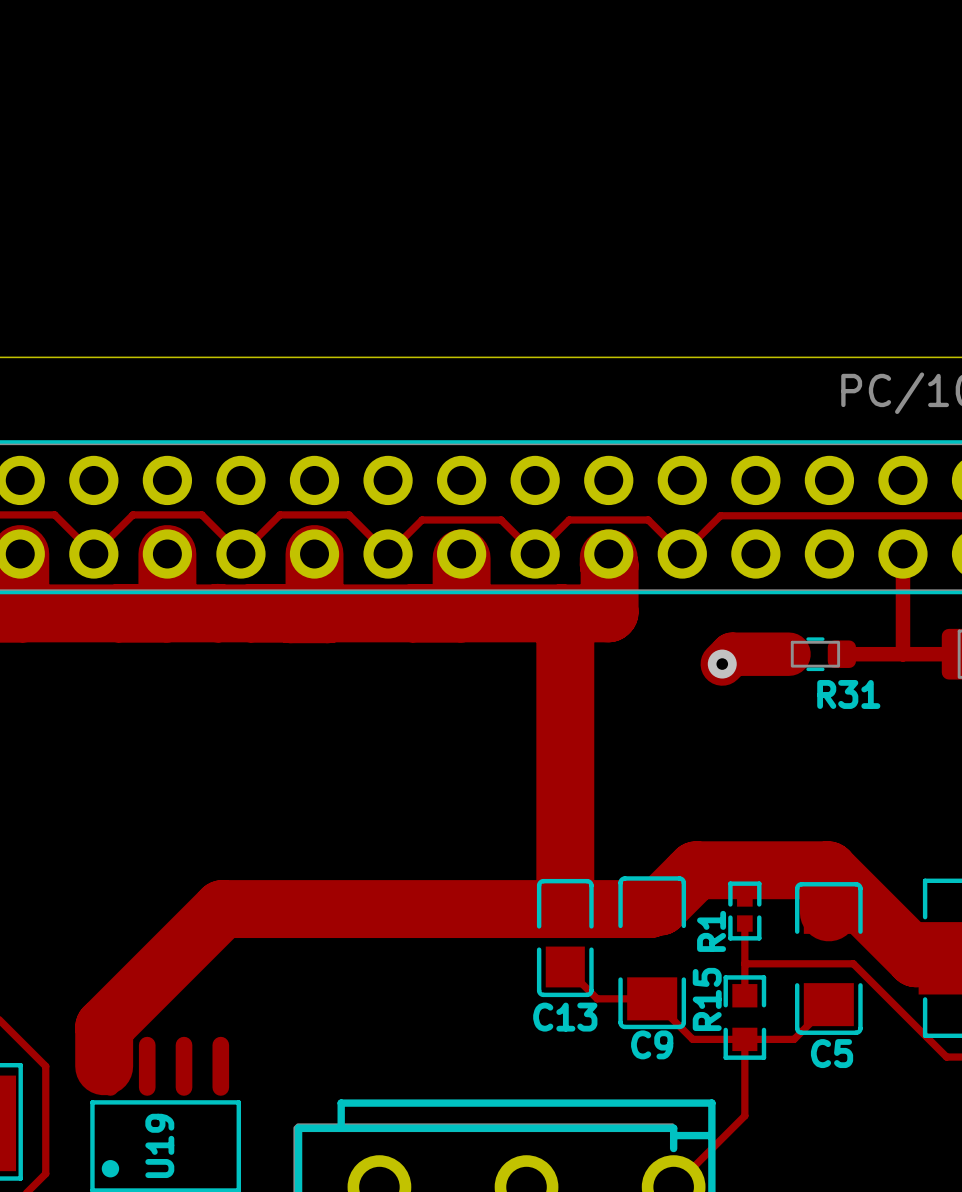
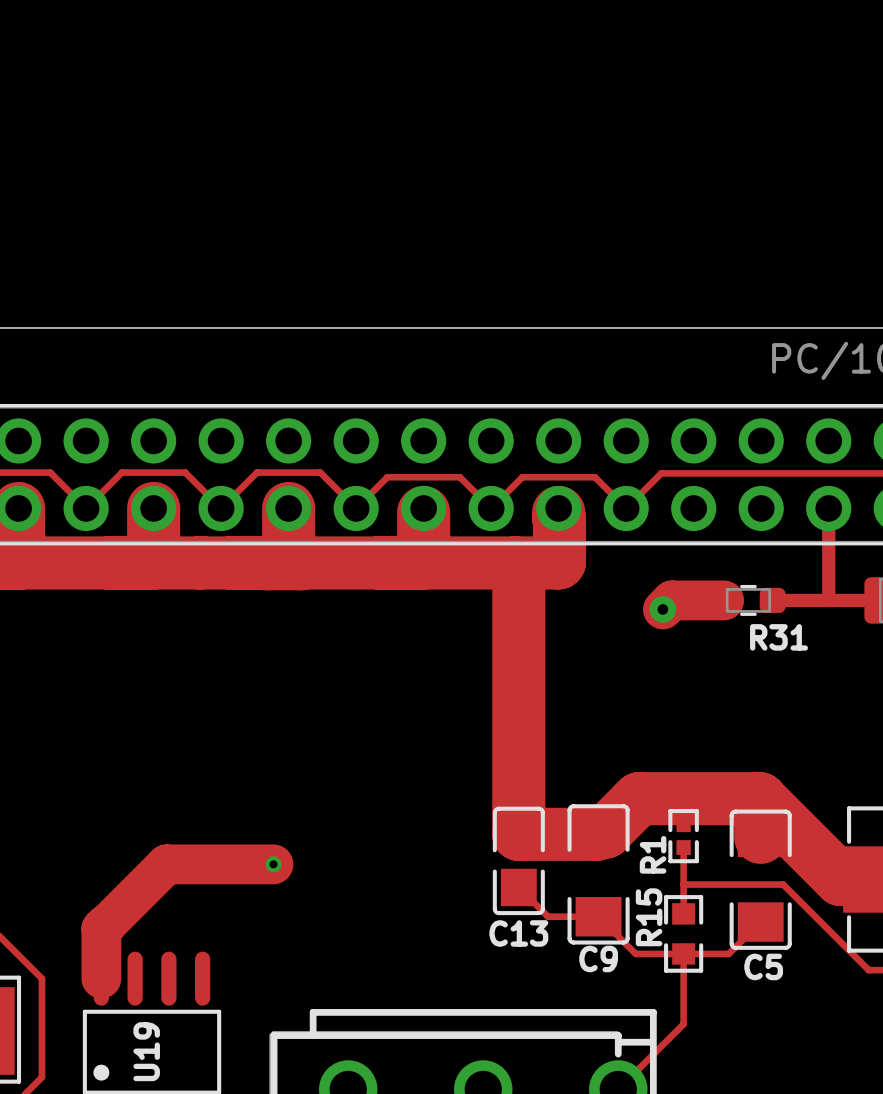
track: (565, 909) (222, 909) (104, 1027) (104, 1066) -> none
track: none -> (273, 864) (166, 864) (101, 928) (101, 978)
via: none -> (273, 864)

